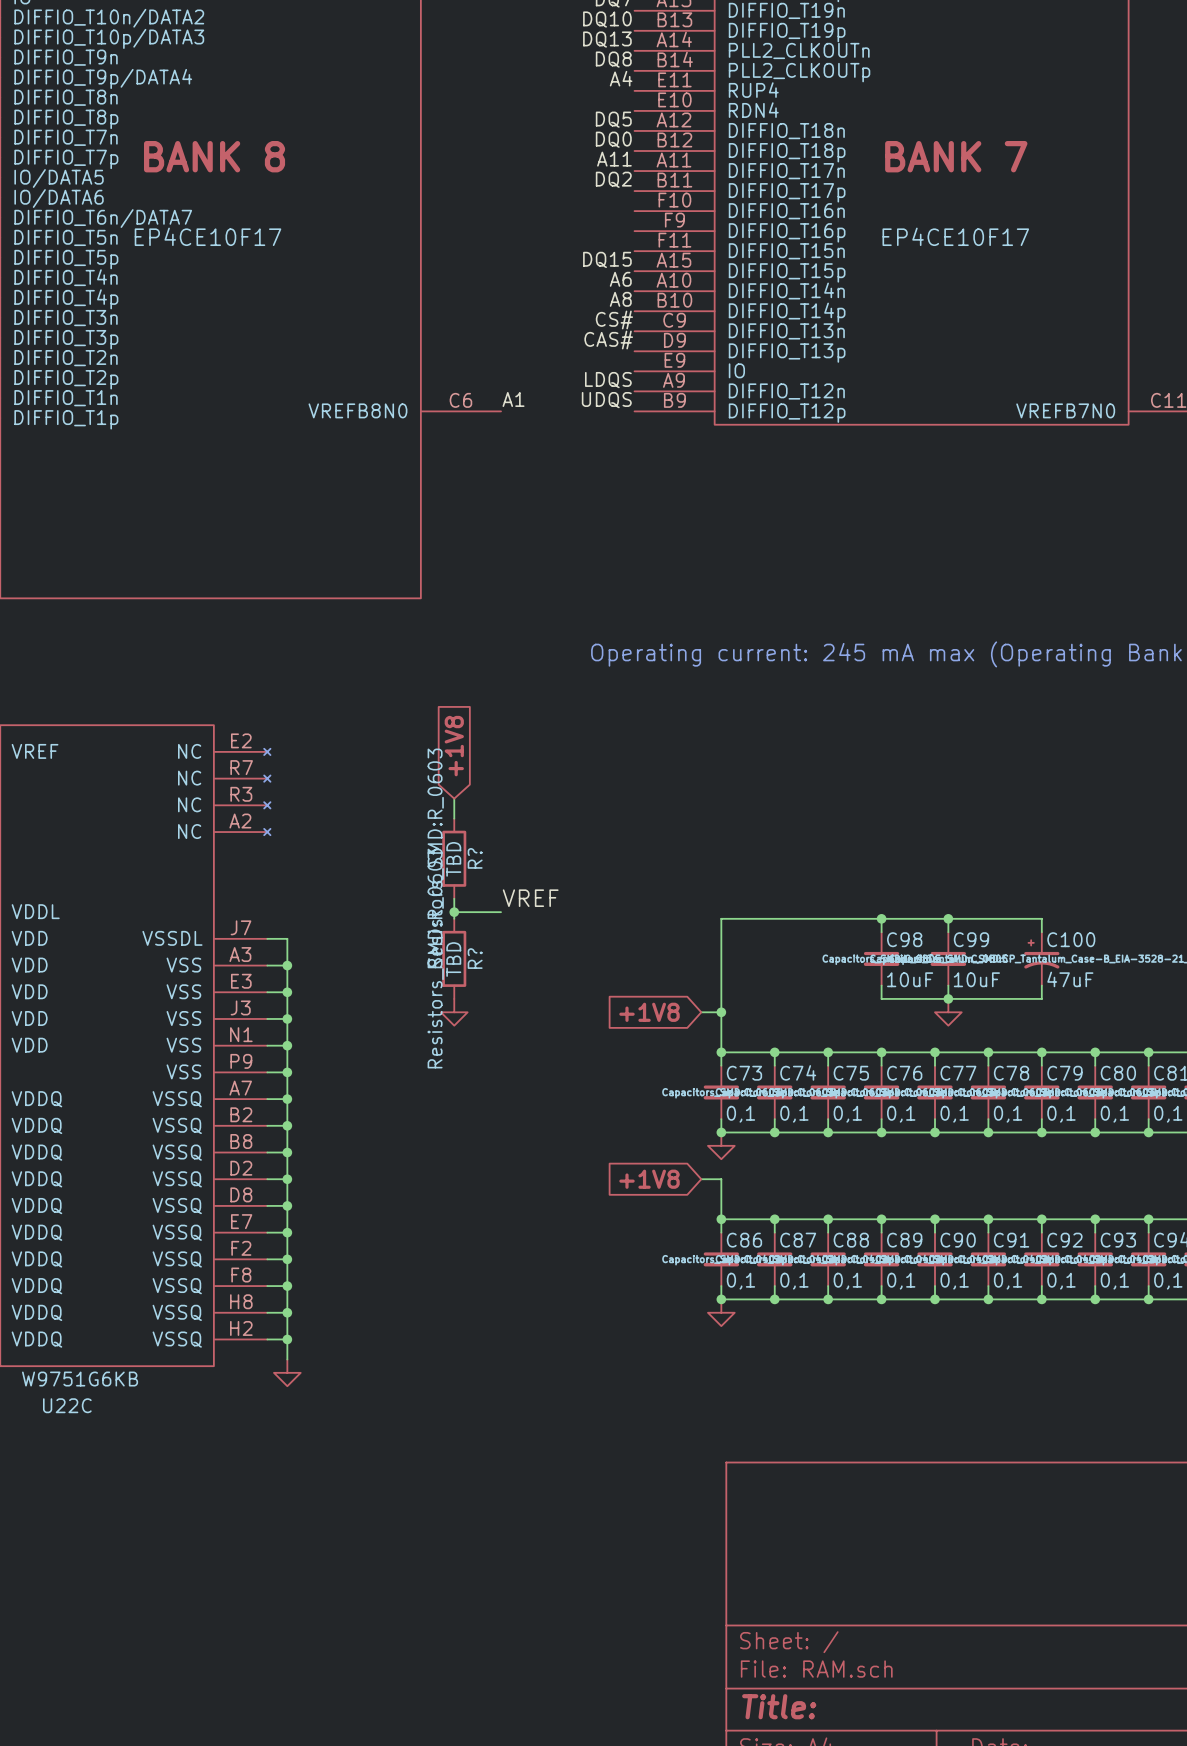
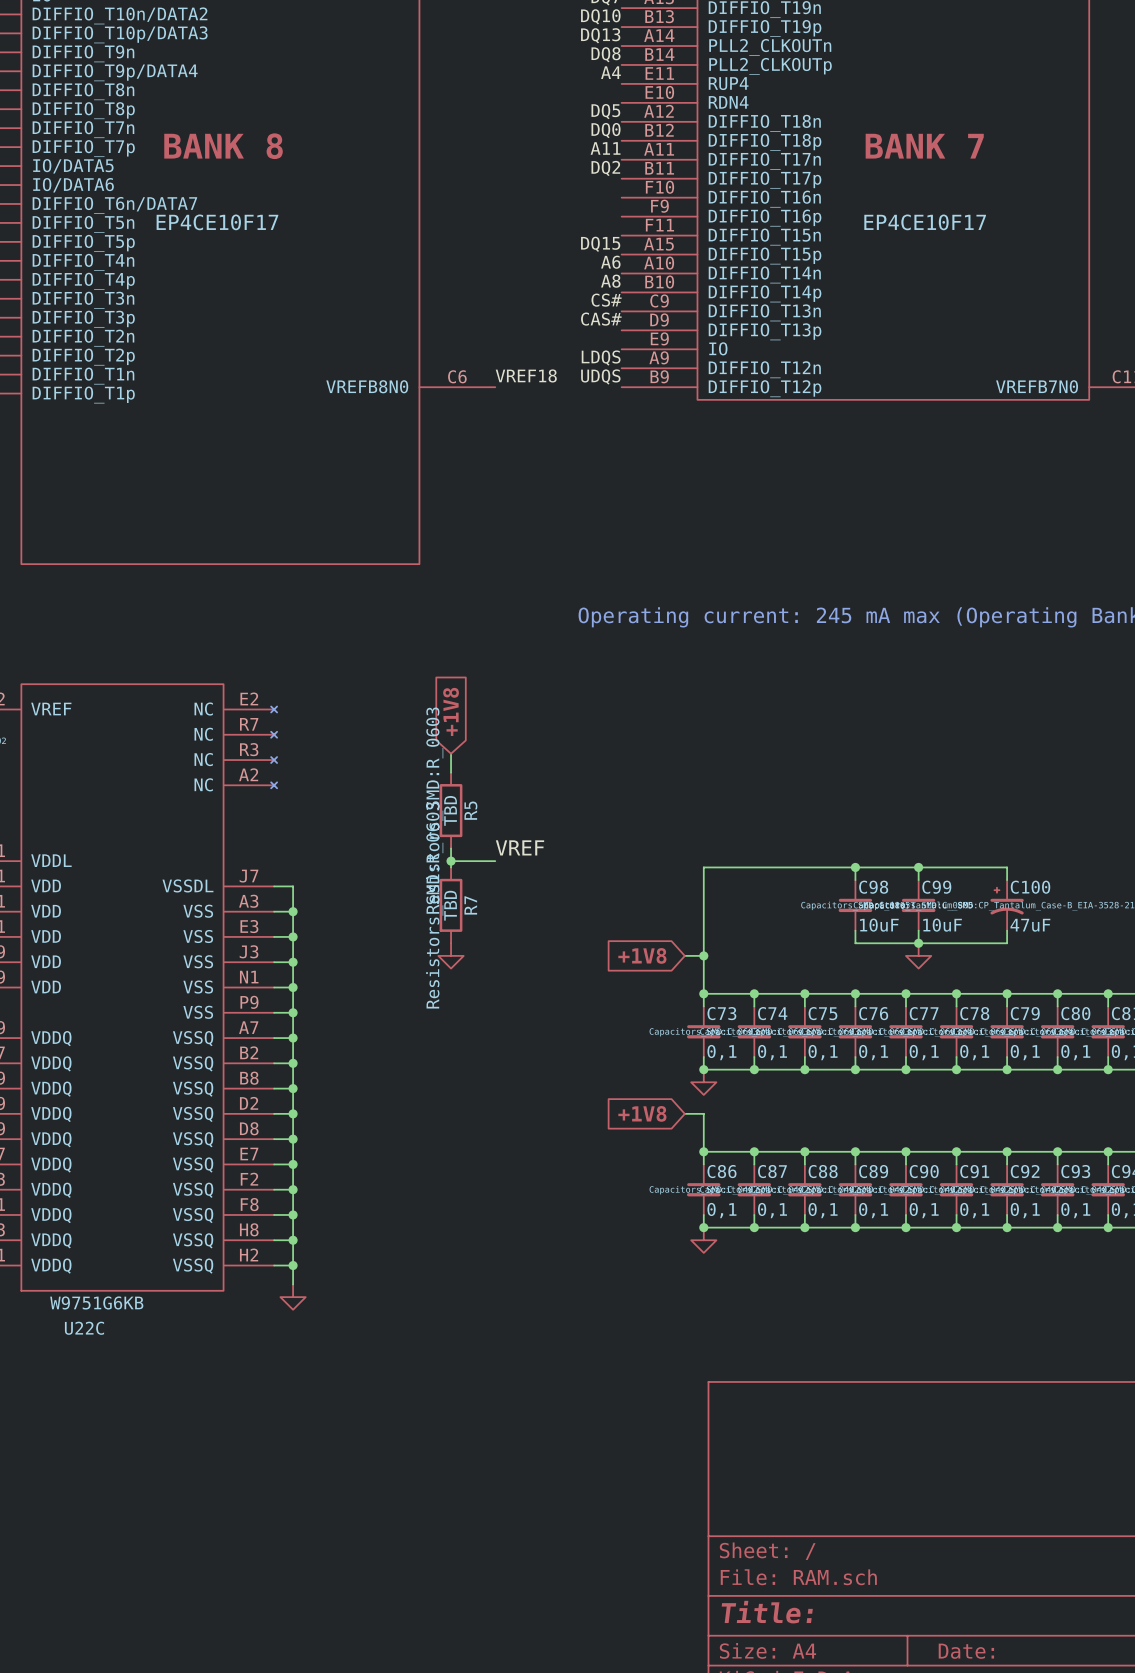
label: A1 (513, 399) -> VREF18 (526, 375)
R? name: R? (475, 858) -> R5 (470, 810)
R? name: R? (475, 958) -> R7 (470, 905)

